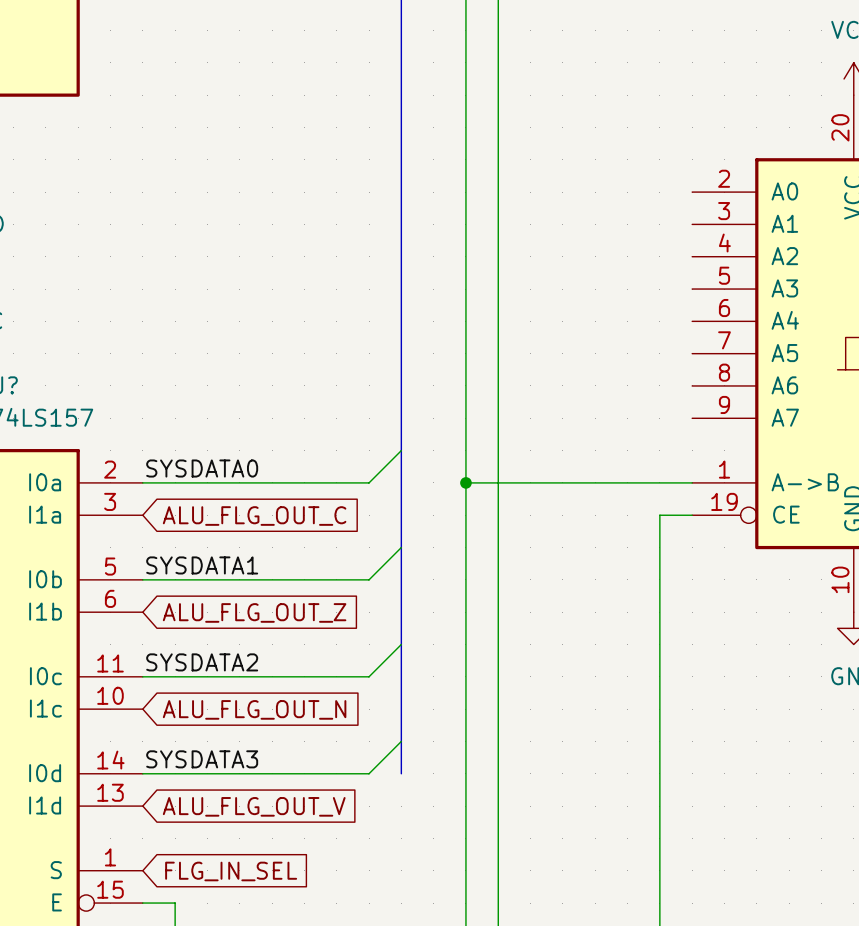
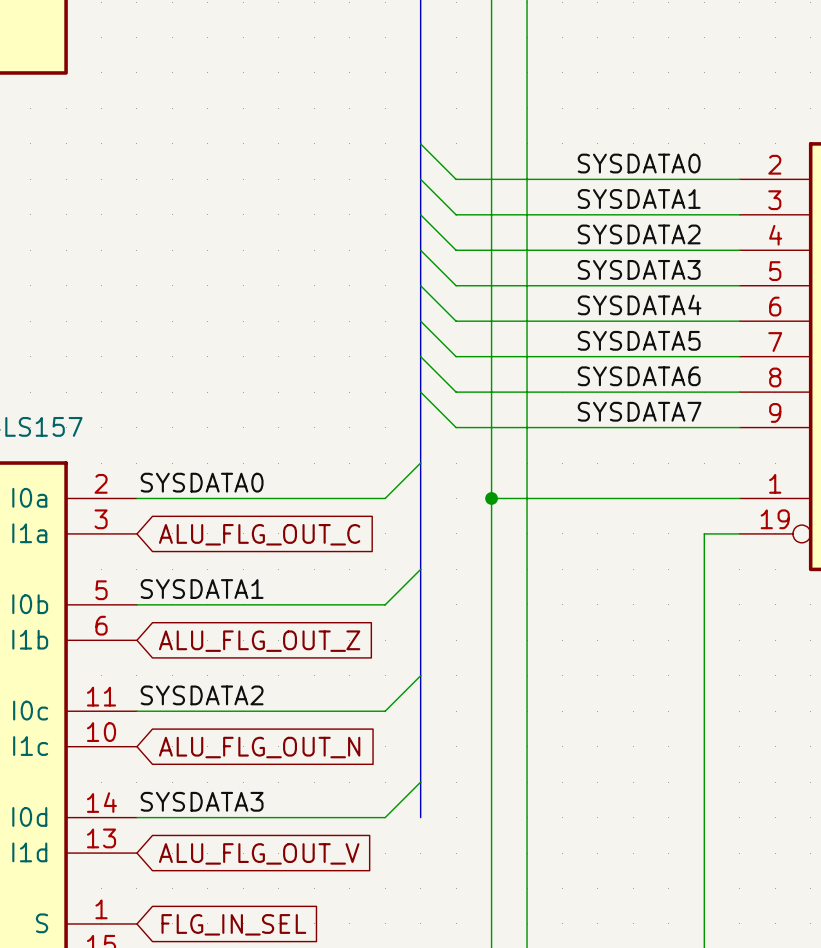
wire: none -> (420, 143) (456, 179) (739, 179)
label: none -> SYSDATA0 (639, 163)
wire: none -> (420, 179) (456, 214) (739, 214)
label: none -> SYSDATA1 (639, 198)
wire: none -> (420, 214) (456, 250) (739, 250)
label: none -> SYSDATA2 (639, 234)
wire: none -> (420, 250) (456, 285) (739, 285)
label: none -> SYSDATA3 (639, 269)
wire: none -> (420, 285) (456, 321) (739, 321)
label: none -> SYSDATA4 (639, 304)
wire: none -> (420, 321) (456, 356) (739, 356)
label: none -> SYSDATA5 (639, 340)
wire: none -> (420, 356) (456, 392) (739, 392)
label: none -> SYSDATA6 (639, 376)
wire: none -> (420, 392) (456, 427) (739, 427)
label: none -> SYSDATA7 (639, 411)

